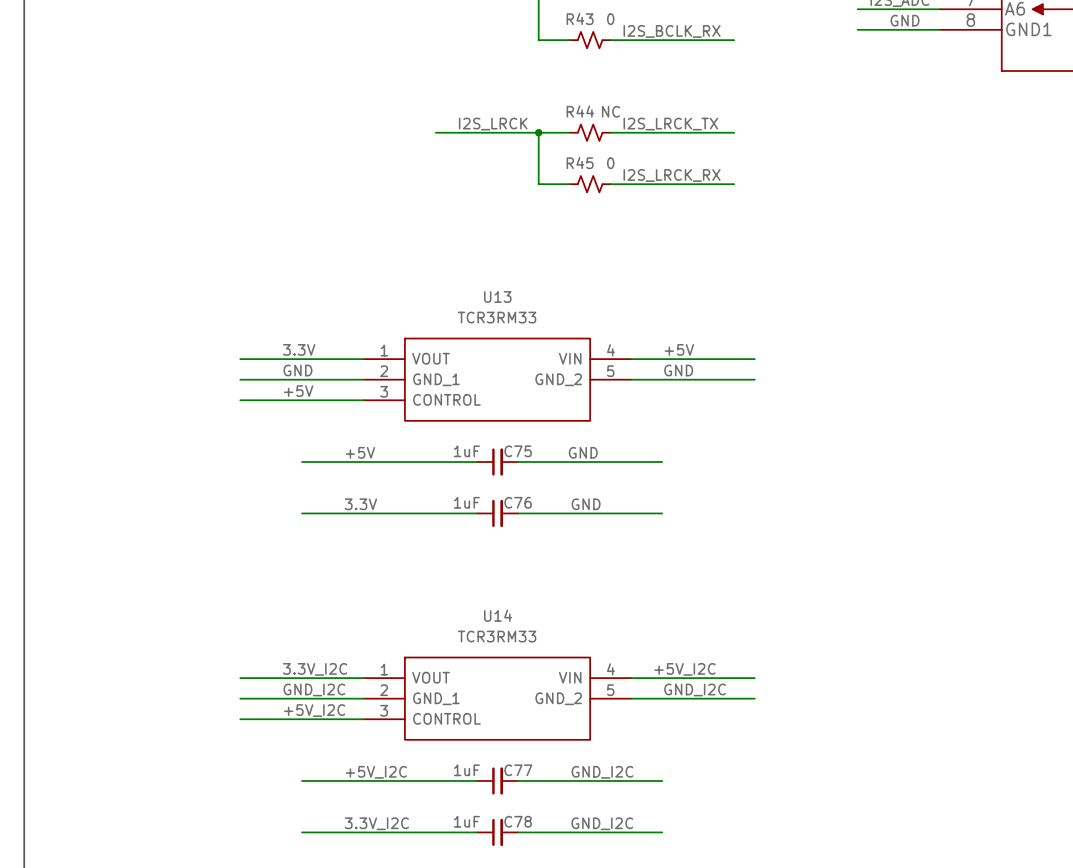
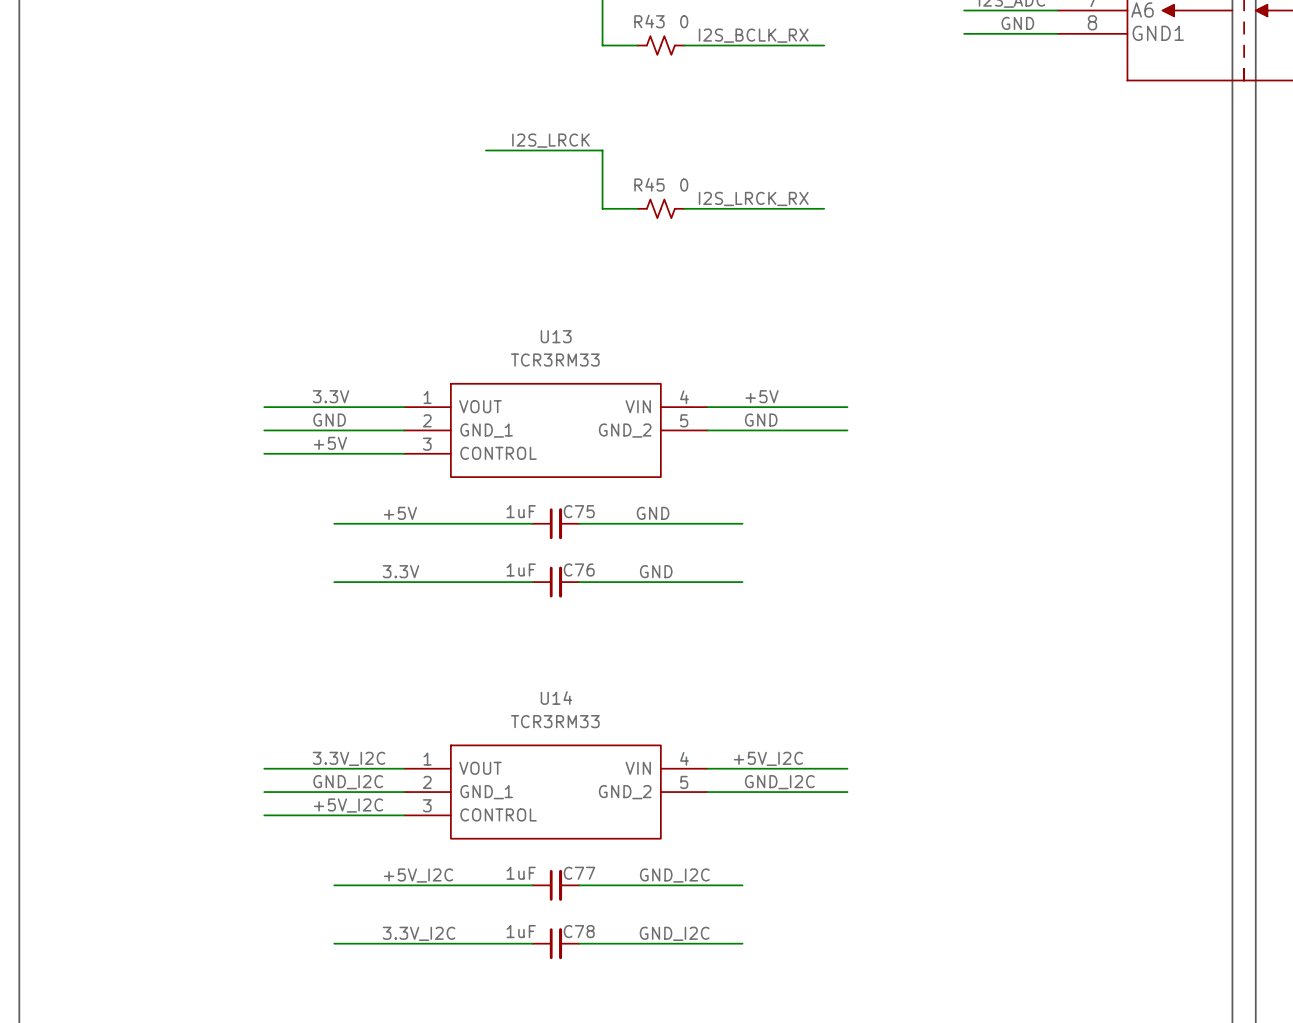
label: I2S_LRCK_TX (670, 124) -> none
wire: (538, 132) (569, 132) -> none
junction: (538, 132) -> none
R44: NC (590, 132) -> none
wire: (610, 132) (734, 132) -> none

